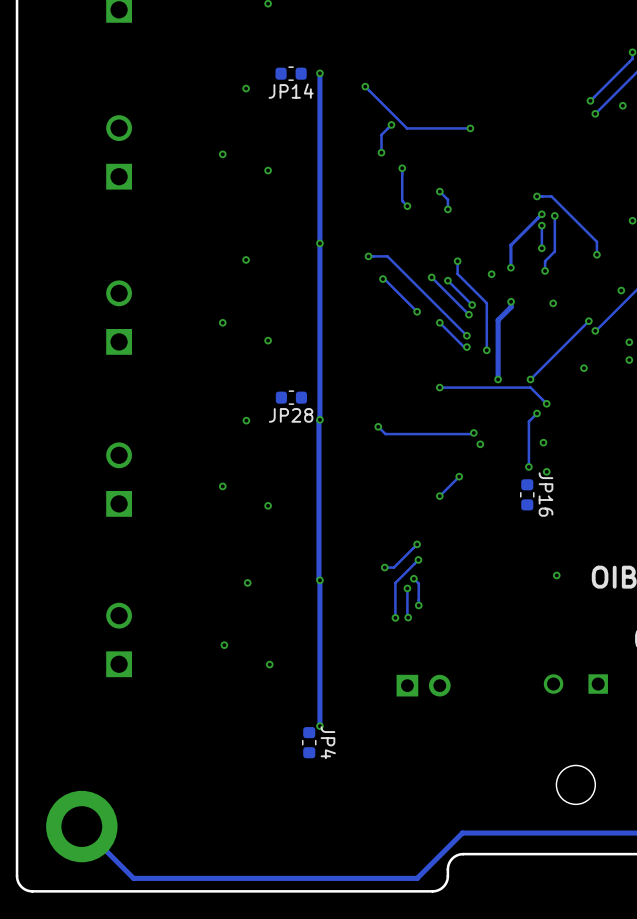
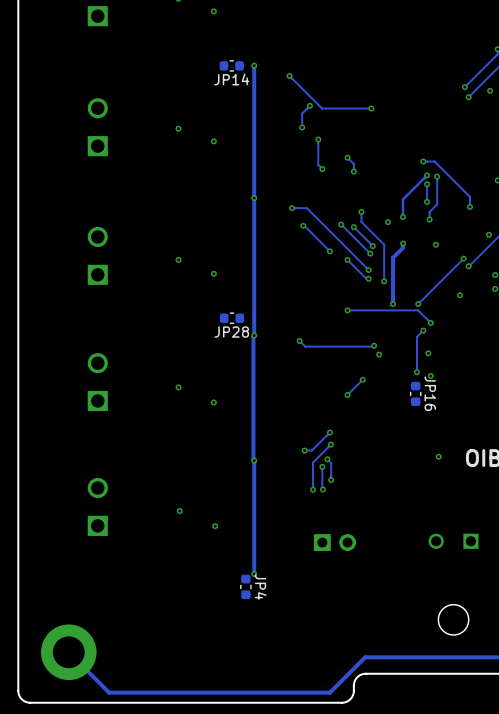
via: (246, 88) -> none
via: (246, 259) -> none
via: (246, 420) -> none
via: (247, 582) -> none

